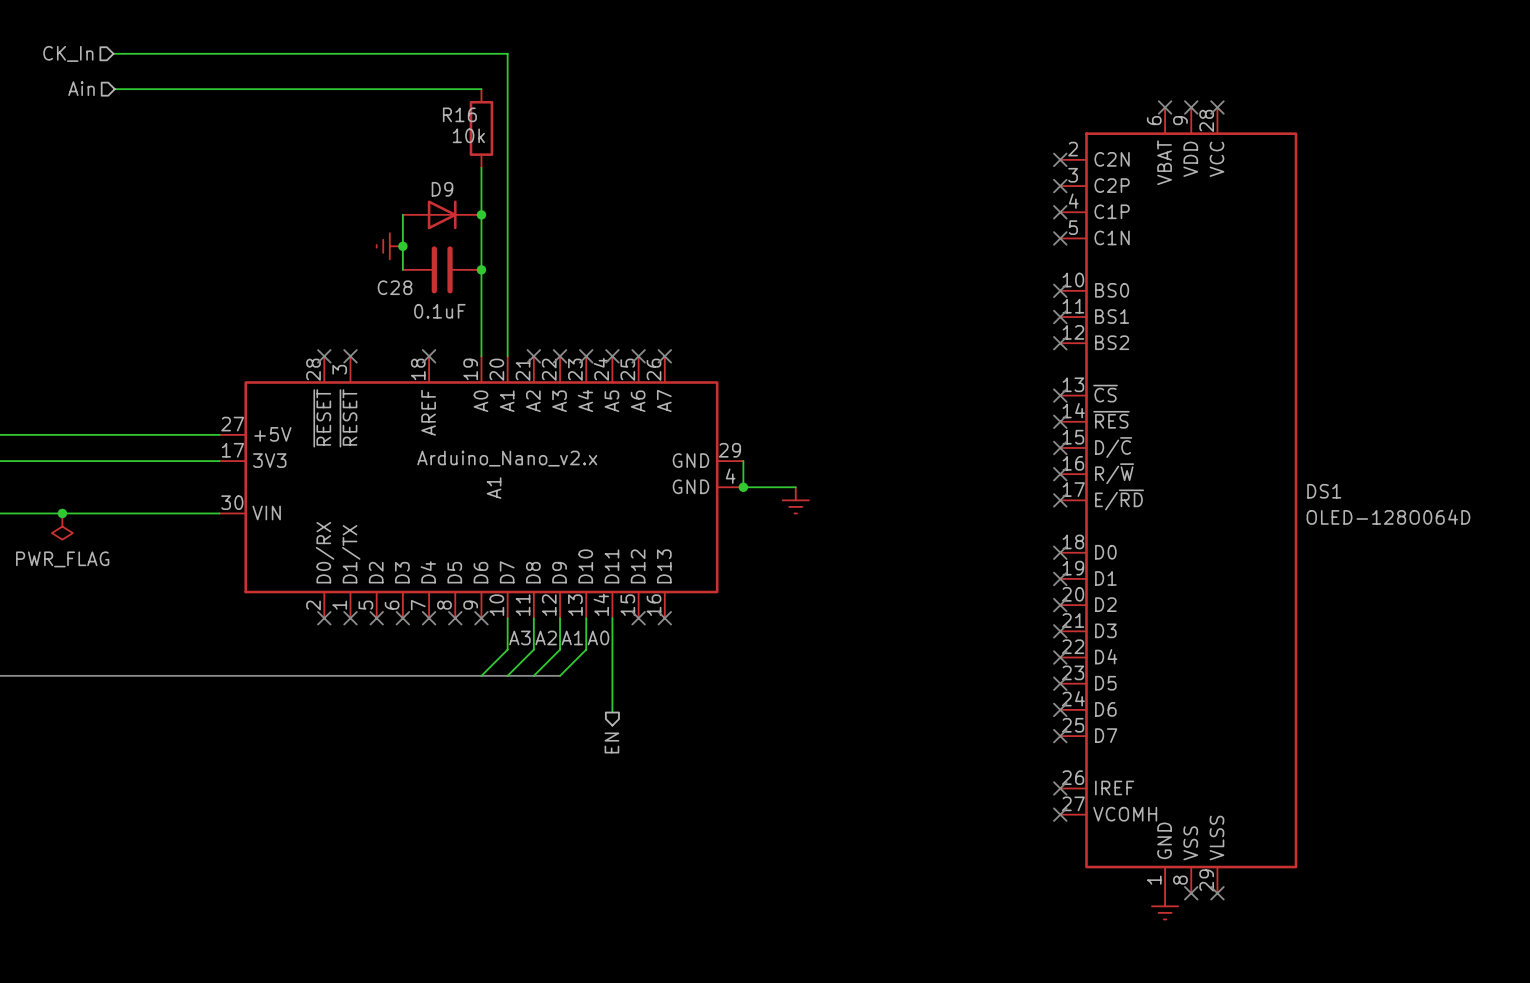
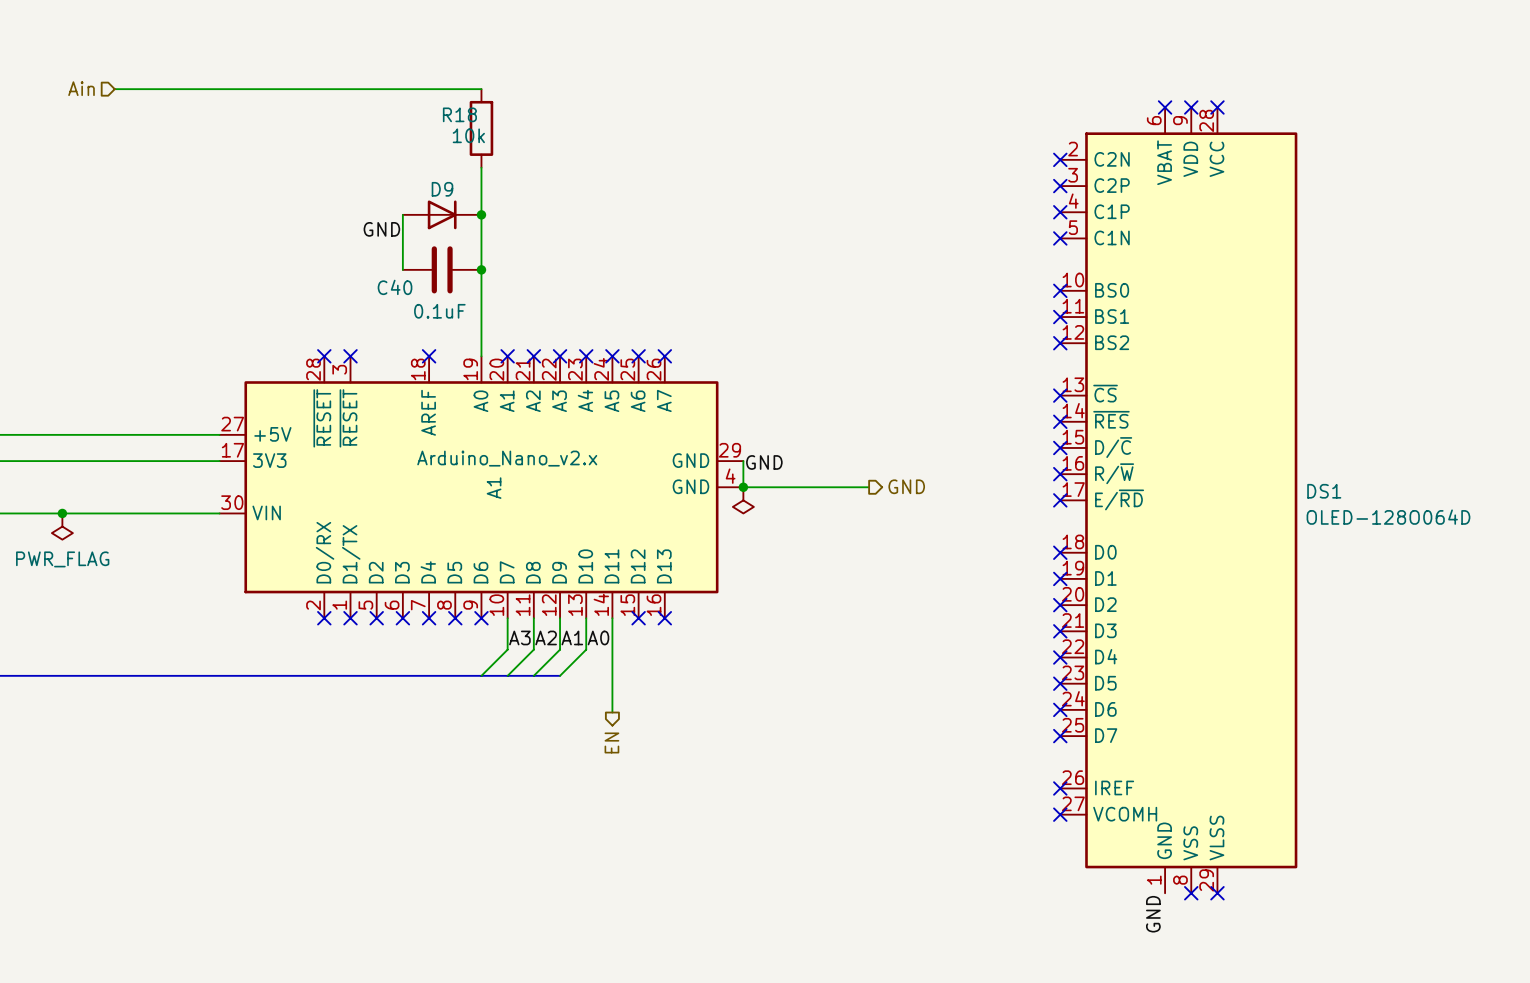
hierarchical label: CK_In (68, 53) -> none
wire: (113, 53) (507, 53) (507, 356) -> none
R16 name: R16 (459, 114) -> R18 (459, 114)
label: none -> GND (381, 229)
power symbol: (389, 246) -> none
junction: (402, 246) -> none
C28 name: C28 (395, 287) -> C40 (395, 287)
no-connect mark: none -> (507, 356)
label: none -> GND (764, 462)
hierarchical label: none -> GND (906, 486)
wire: none -> (795, 487) (869, 487)
power symbol: none -> (743, 500)
power symbol: (795, 500) -> none
power symbol: (1165, 906) -> none
label: none -> GND (1153, 914)

